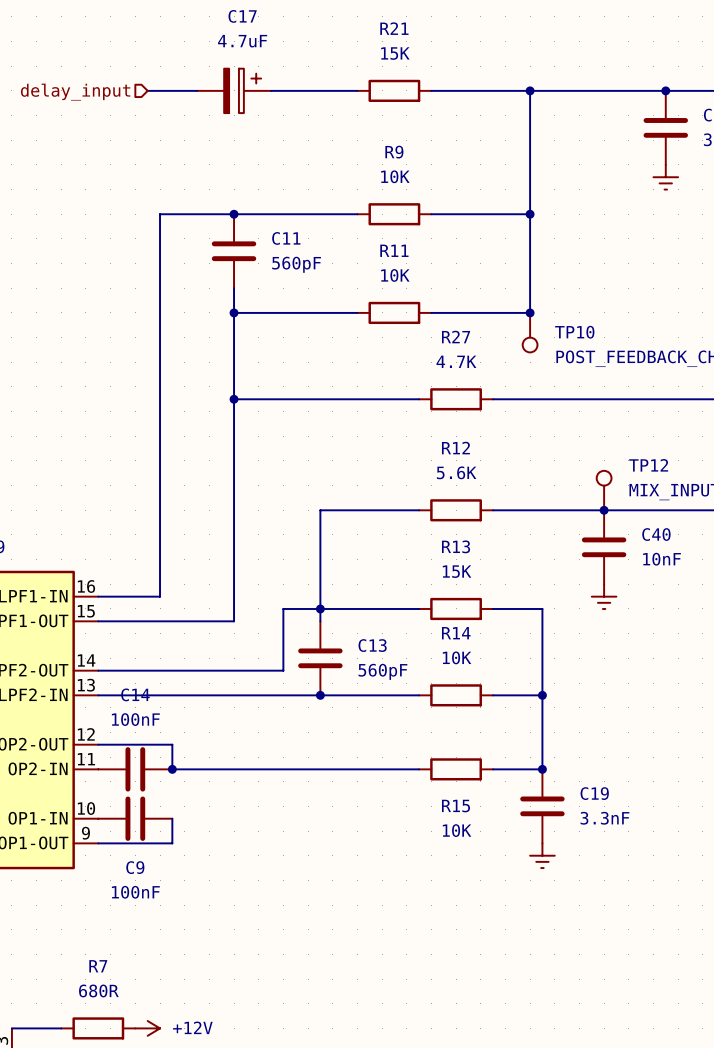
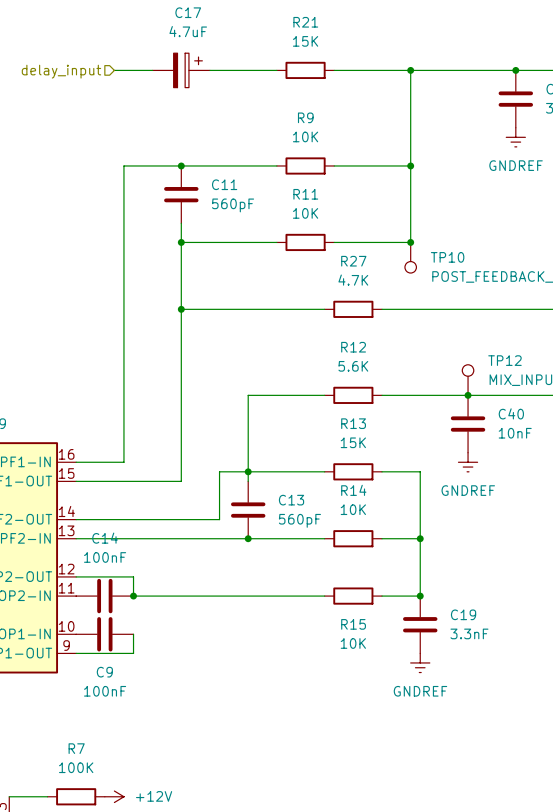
power symbol text: none -> GNDREF (516, 165)
power symbol text: none -> GNDREF (468, 490)
power symbol text: none -> GNDREF (420, 691)
R7 value: 680R (98, 990) -> 100K (76, 767)

